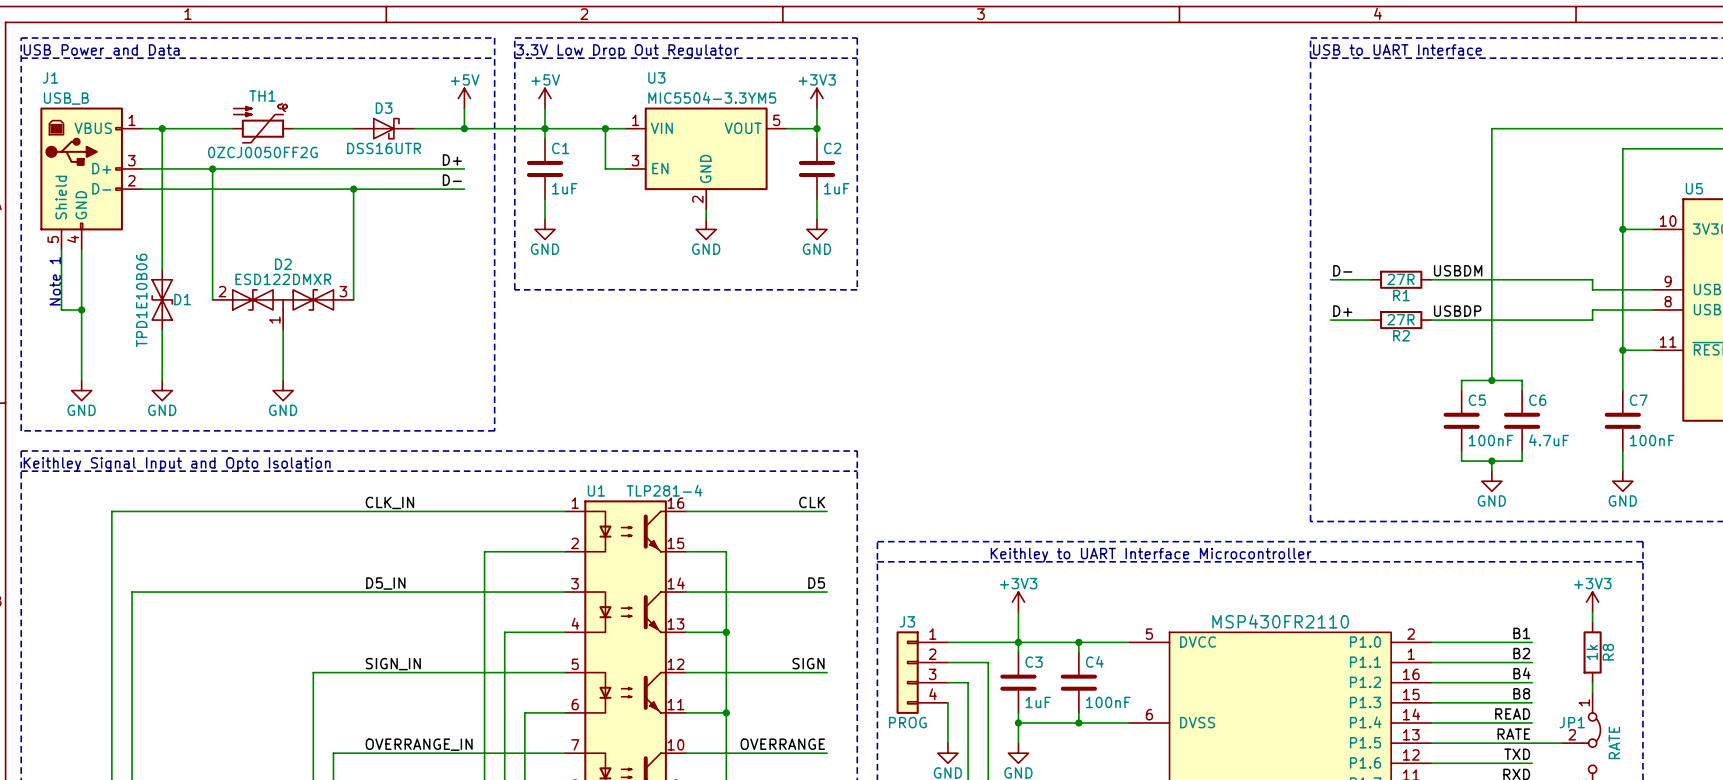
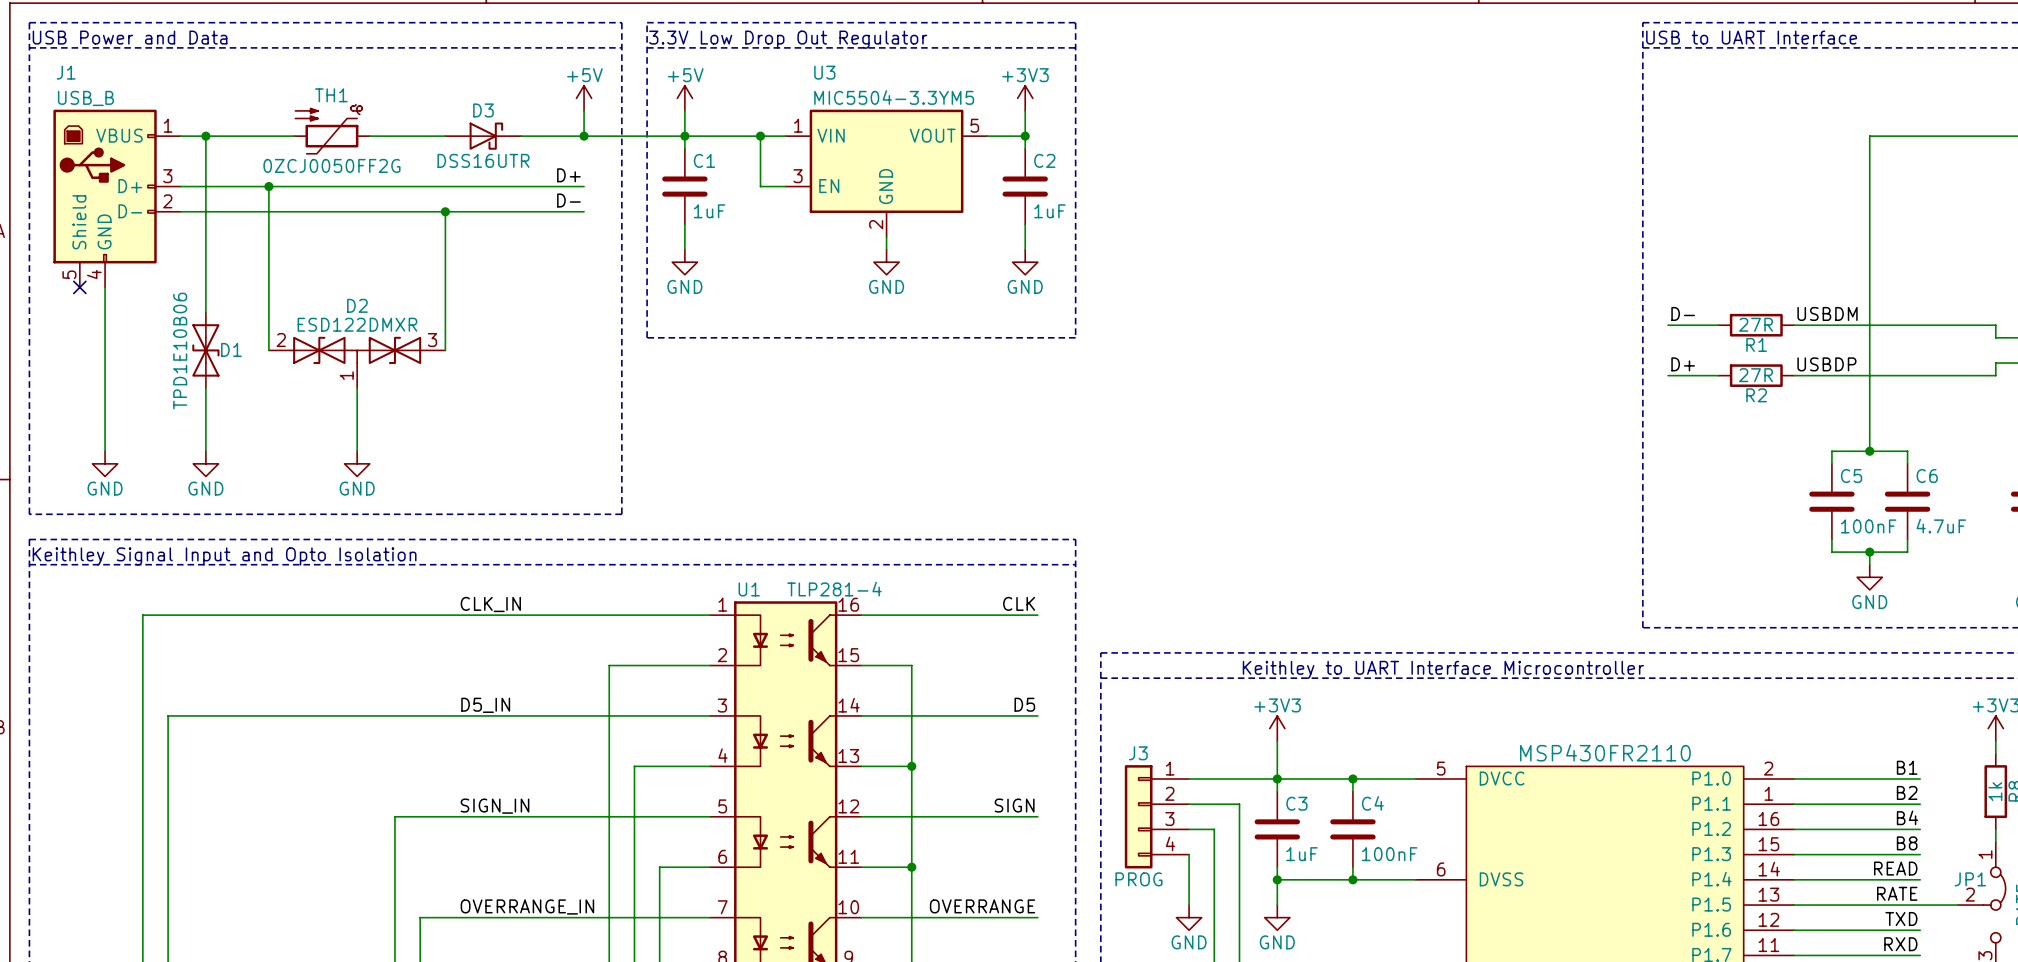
wire: (61, 249) (61, 309) (81, 309) -> none
no-connect mark: none -> (79, 287)
text: Note 1 (55, 281) -> none
junction: (81, 309) -> none

